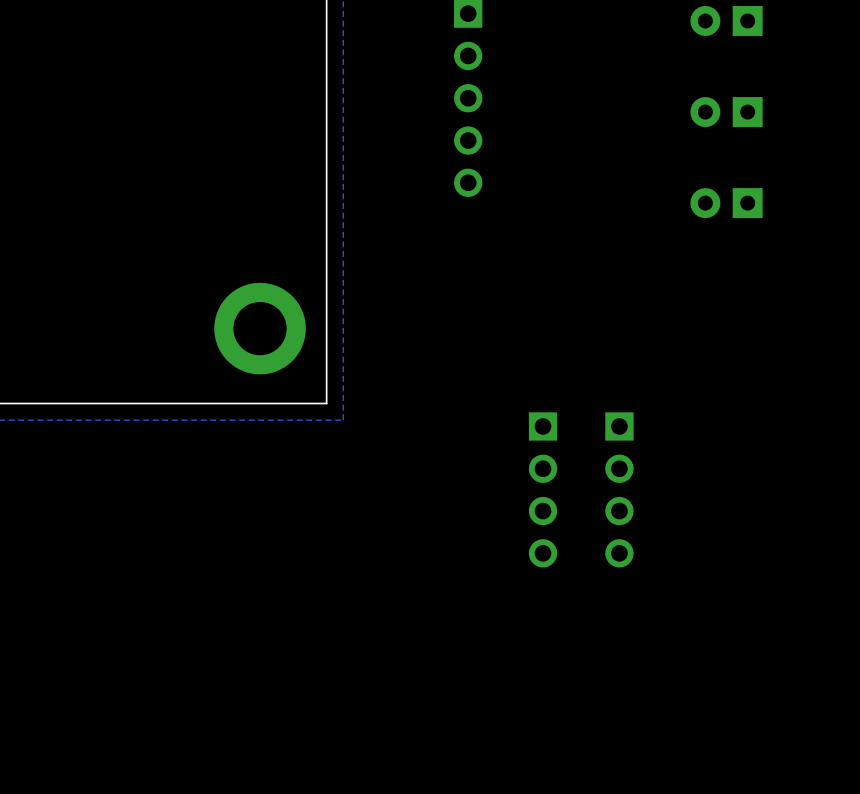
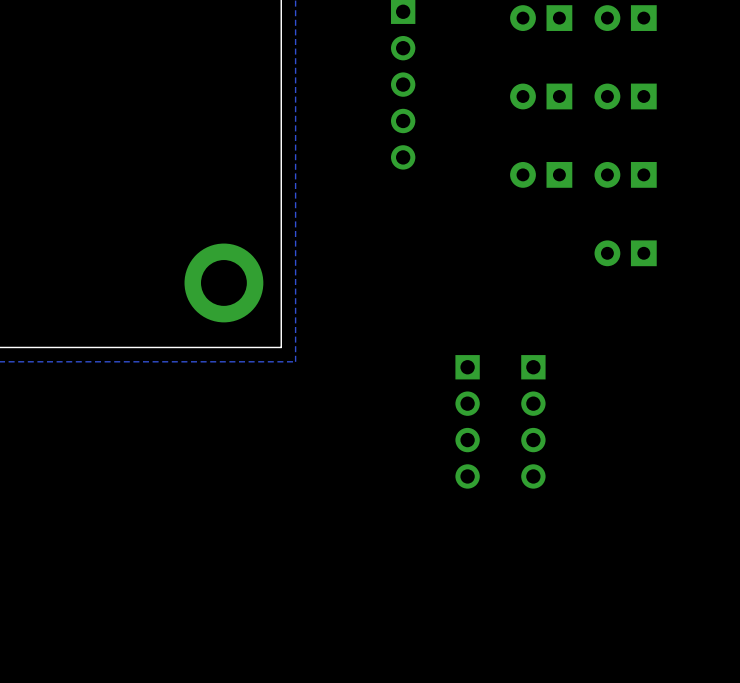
part: none -> (541, 18)
part: none -> (541, 96)
part: none -> (541, 174)
part: none -> (625, 253)

